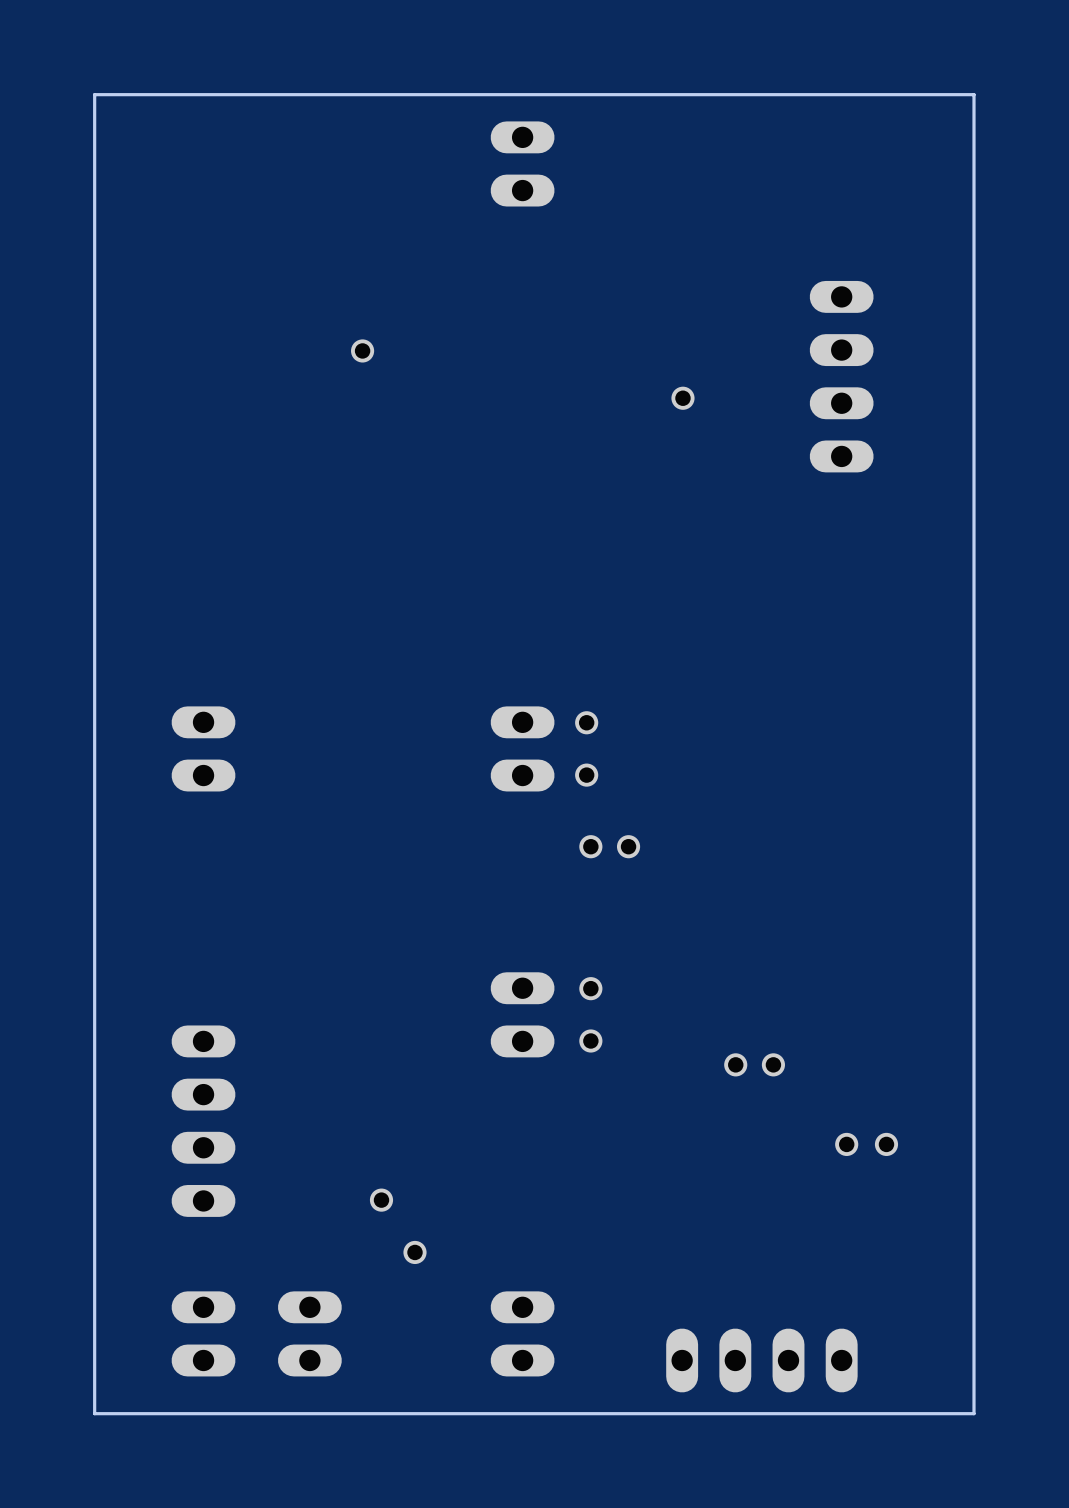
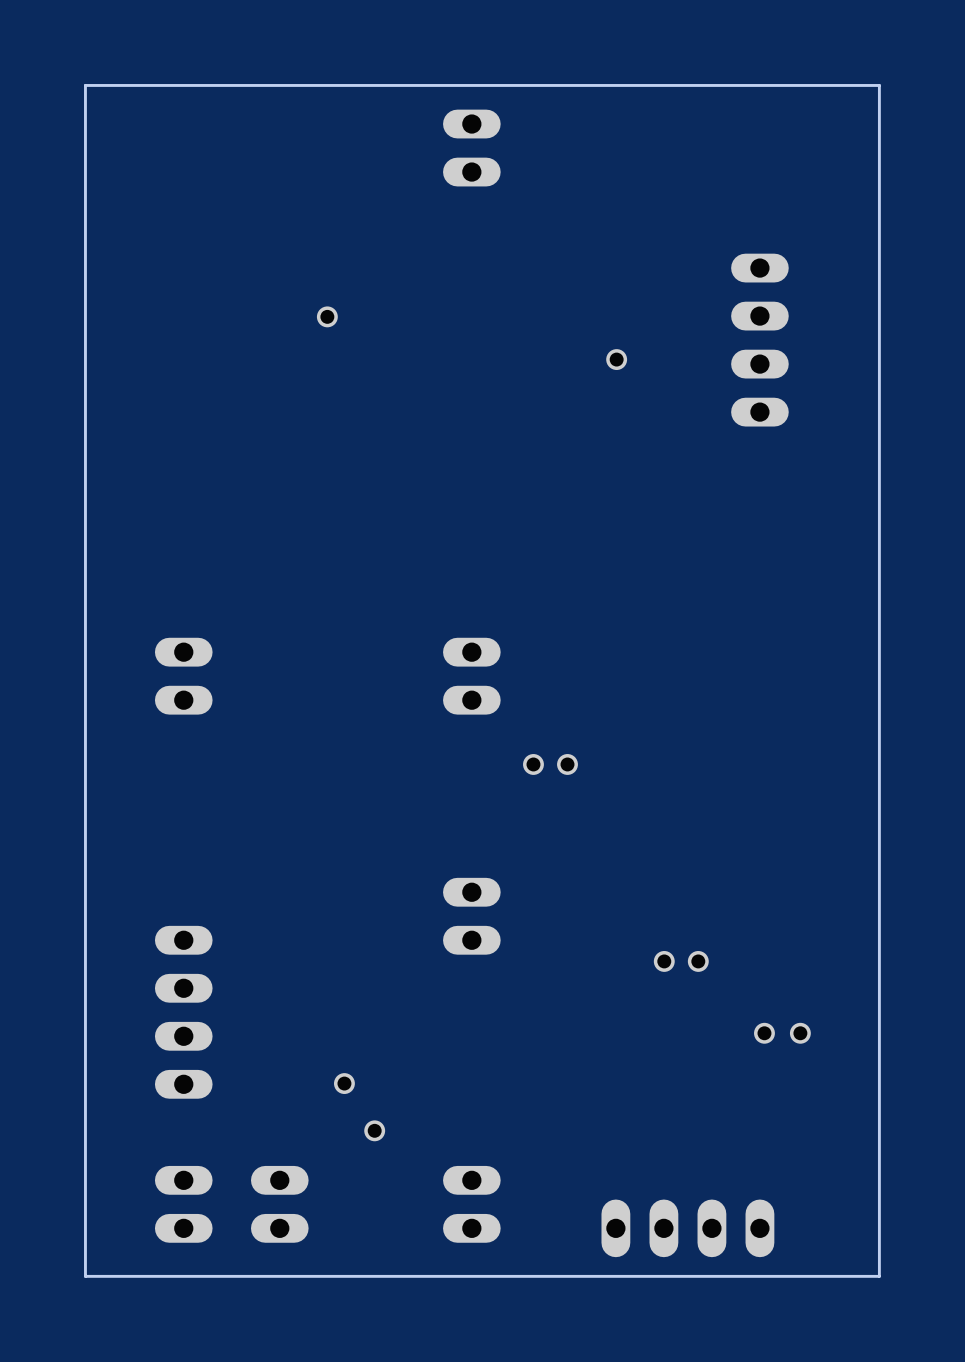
part: (586, 722) -> none
part: (586, 775) -> none
part: (590, 988) -> none
part: (590, 1041) -> none

